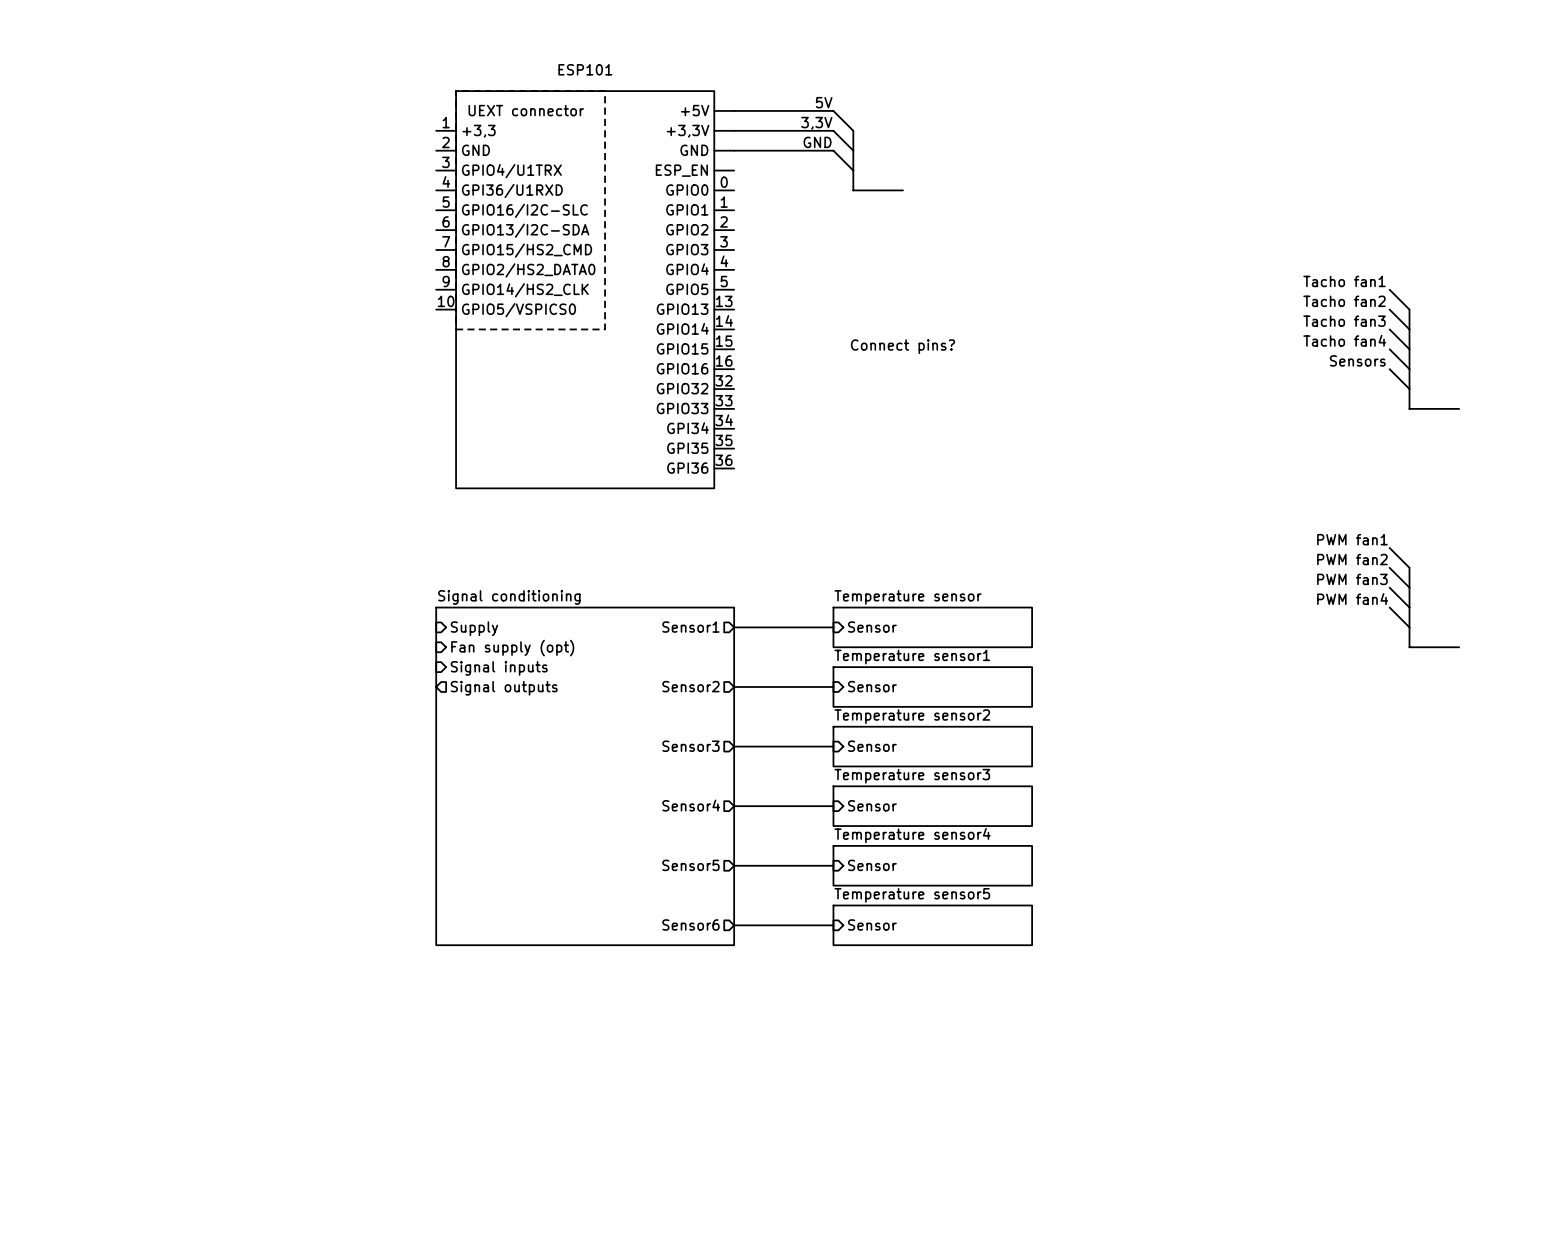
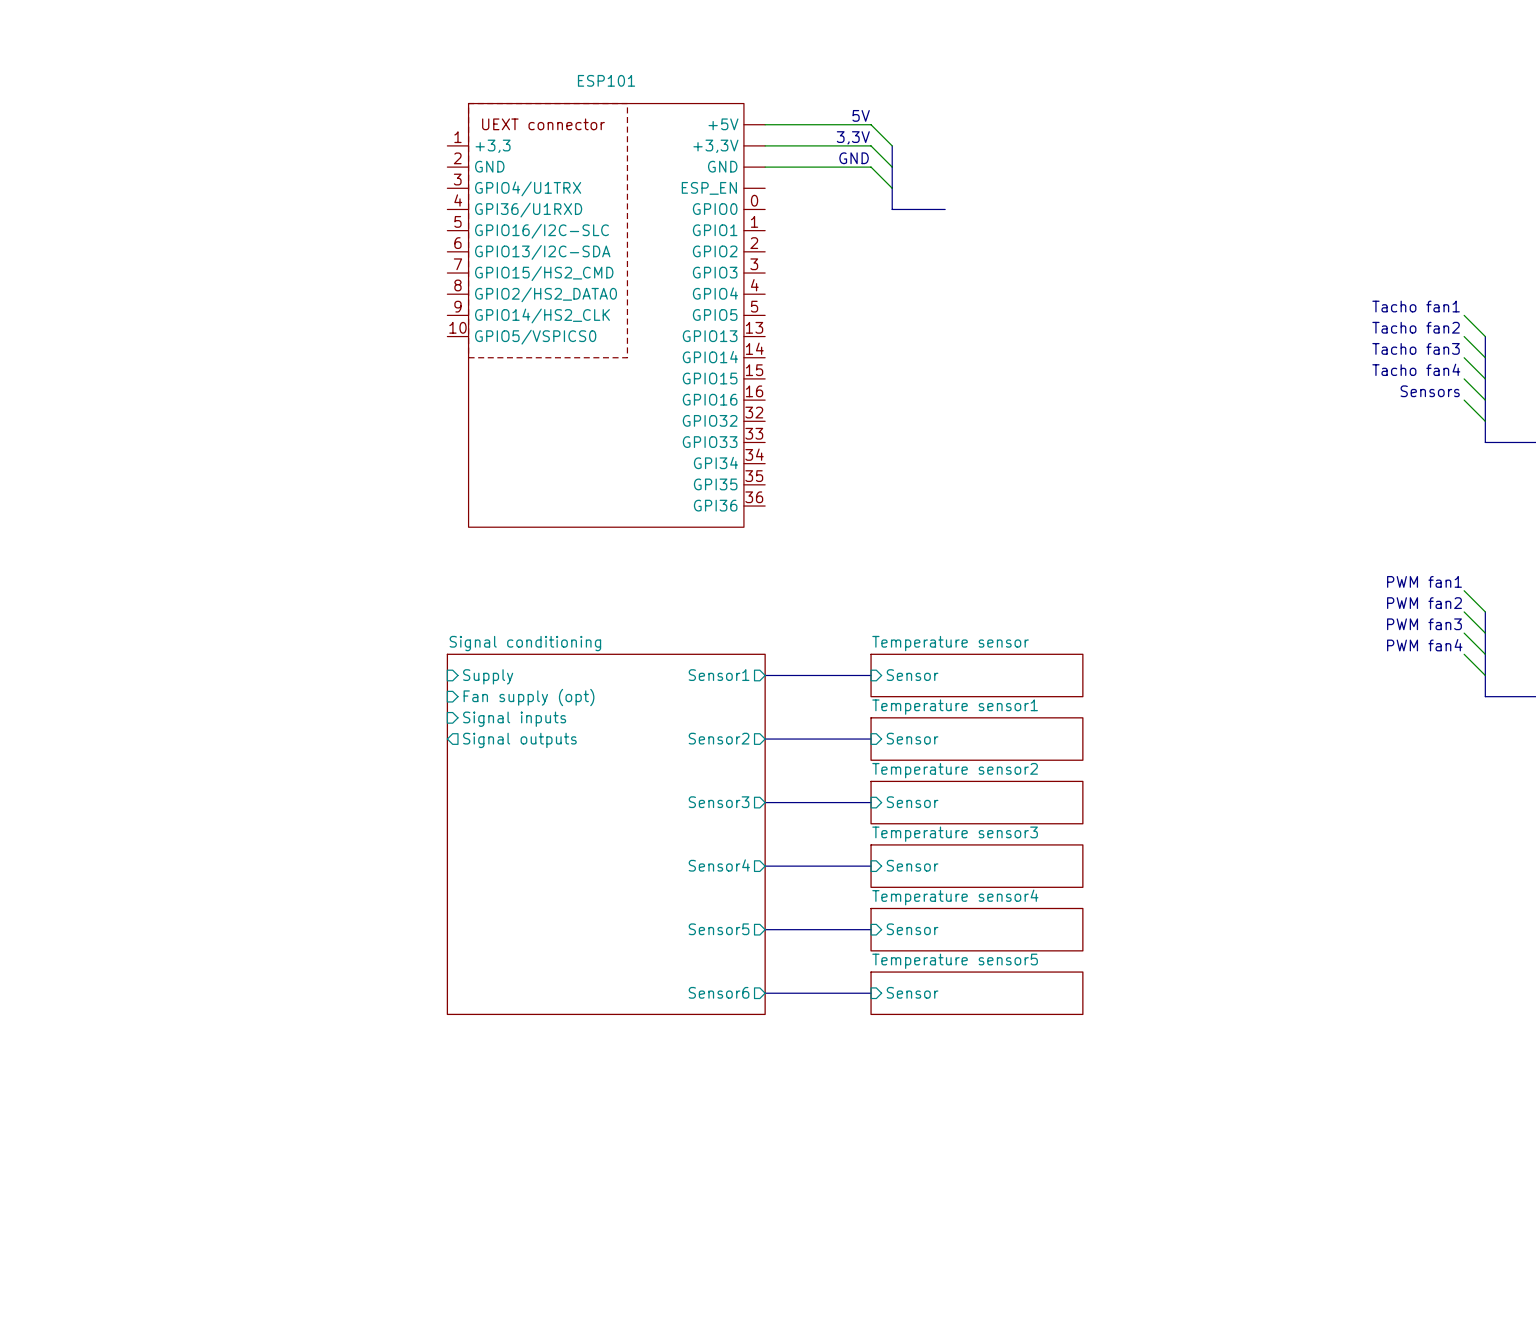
text: Connect pins? (902, 346) -> none

